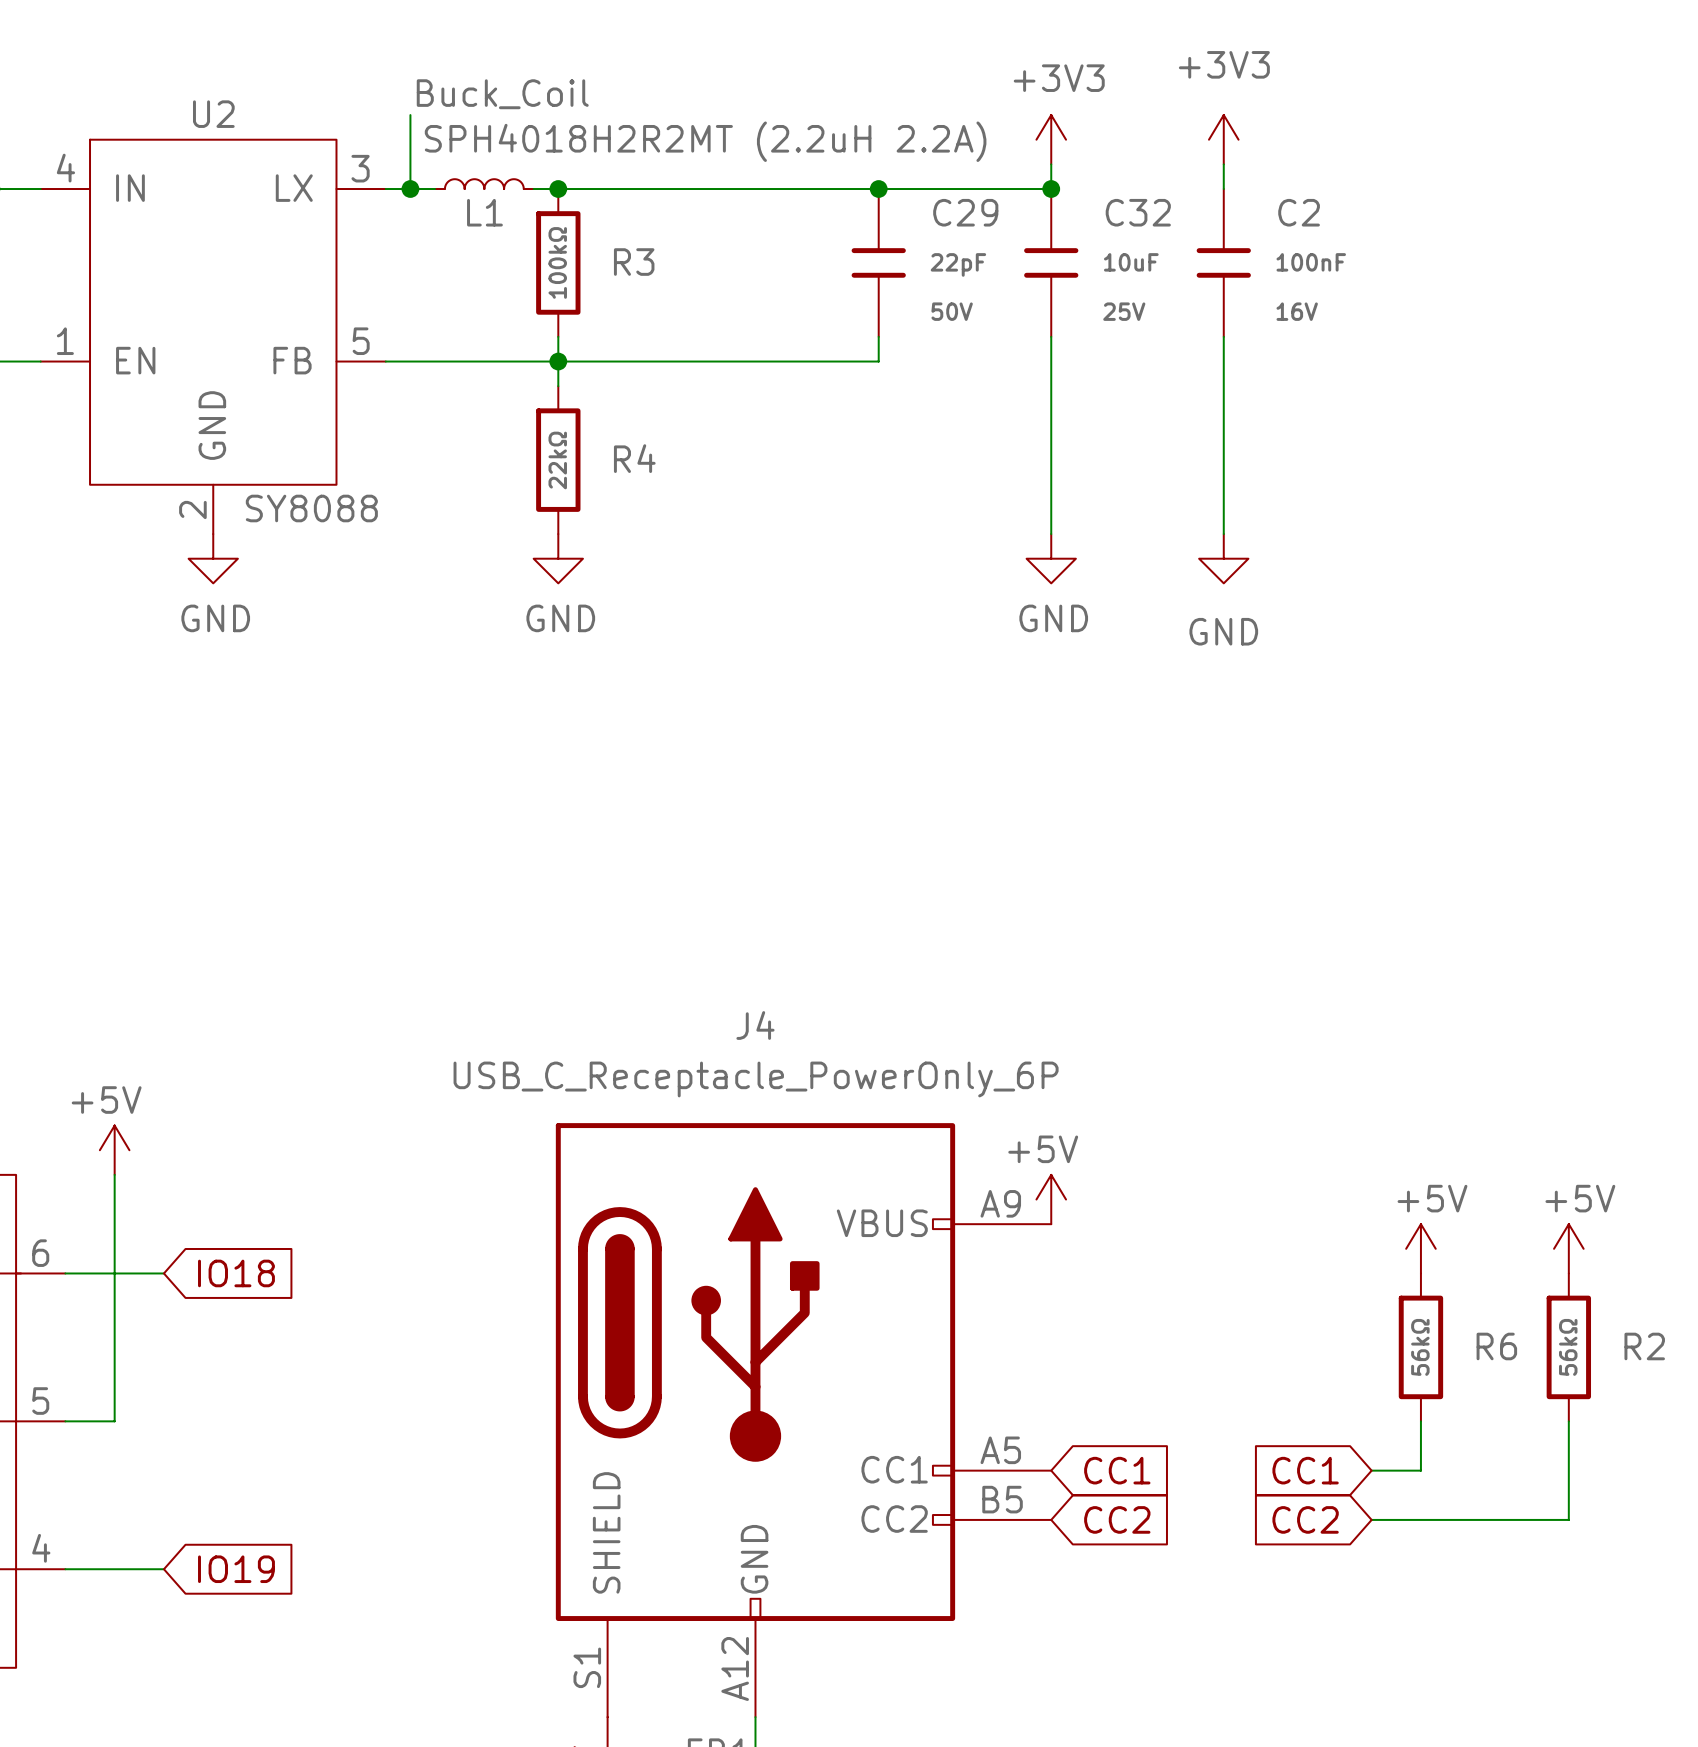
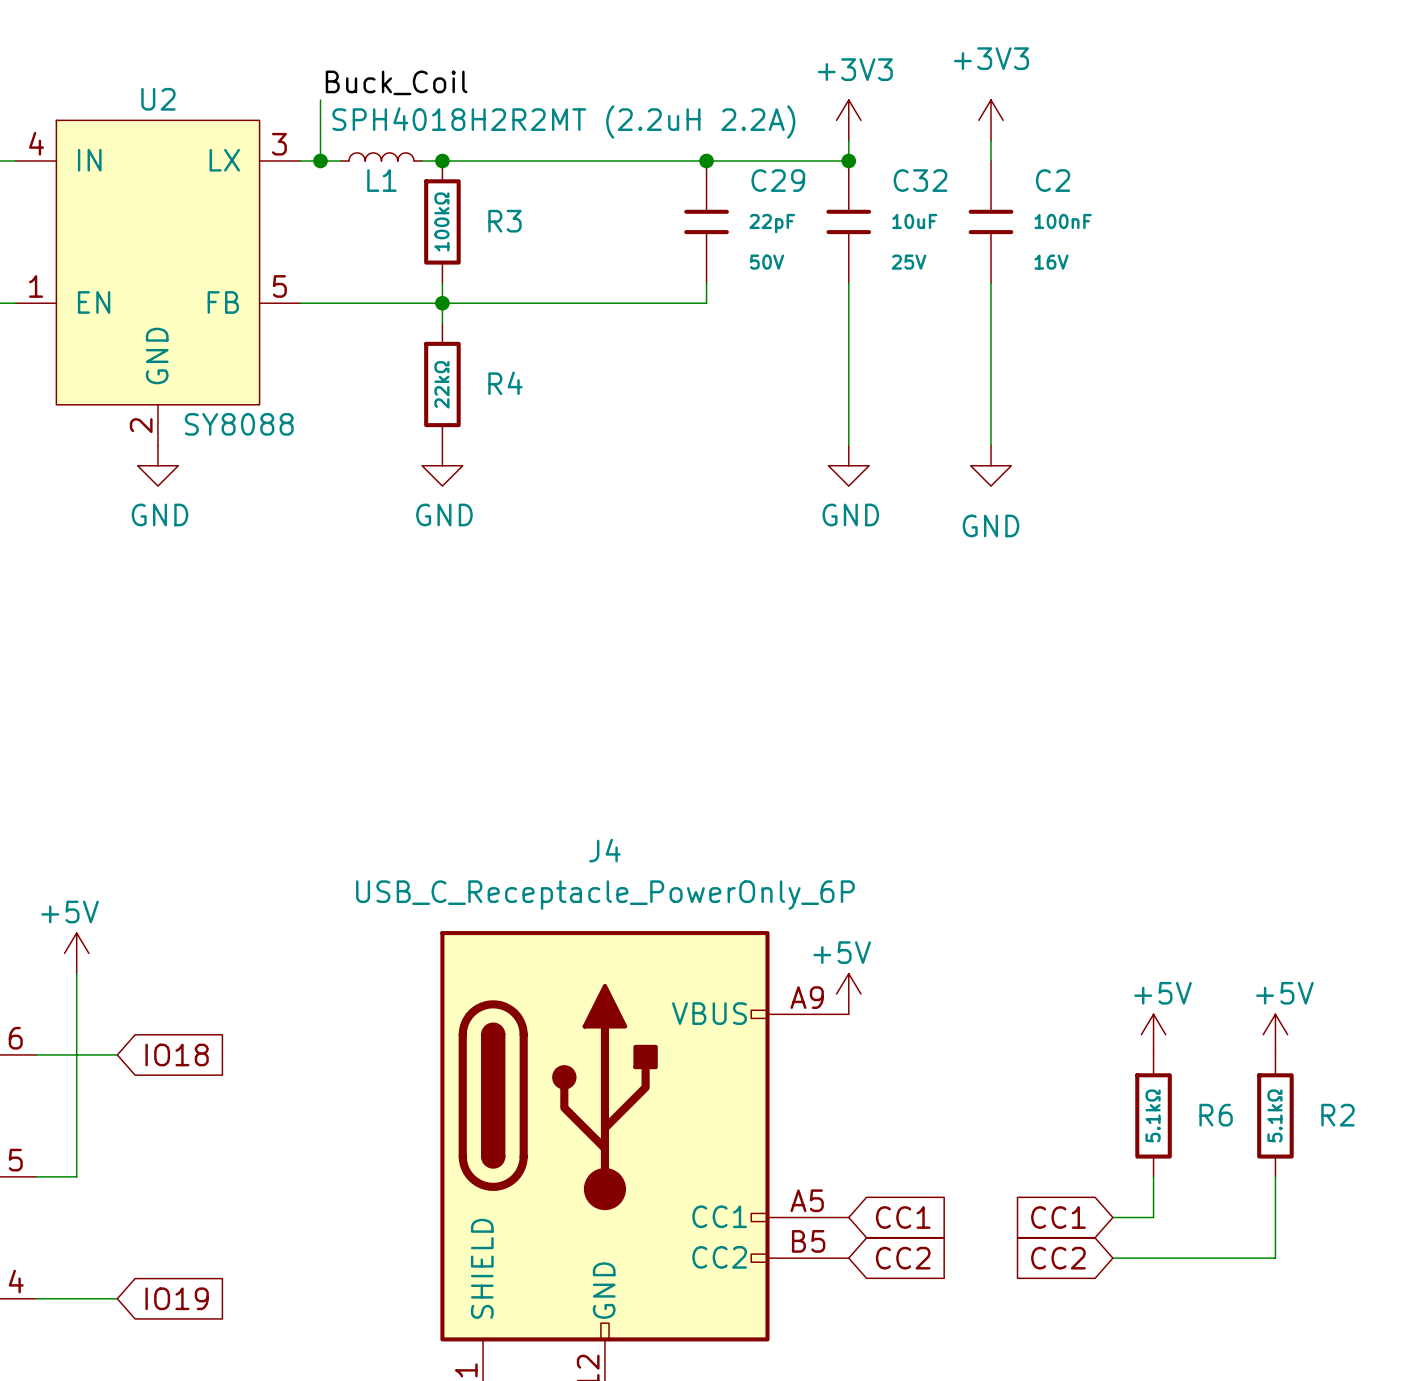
R6 value: 56kΩ (1420, 1347) -> 5.1kΩ (1153, 1115)
R2 value: 56kΩ (1568, 1347) -> 5.1kΩ (1274, 1115)

